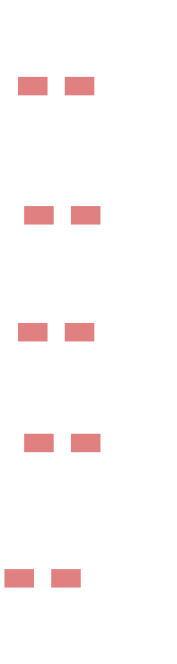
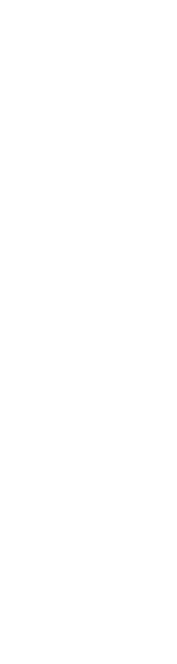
part: (56, 86) -> none
part: (62, 215) -> none
part: (56, 332) -> none
part: (62, 442) -> none
part: (42, 578) -> none

